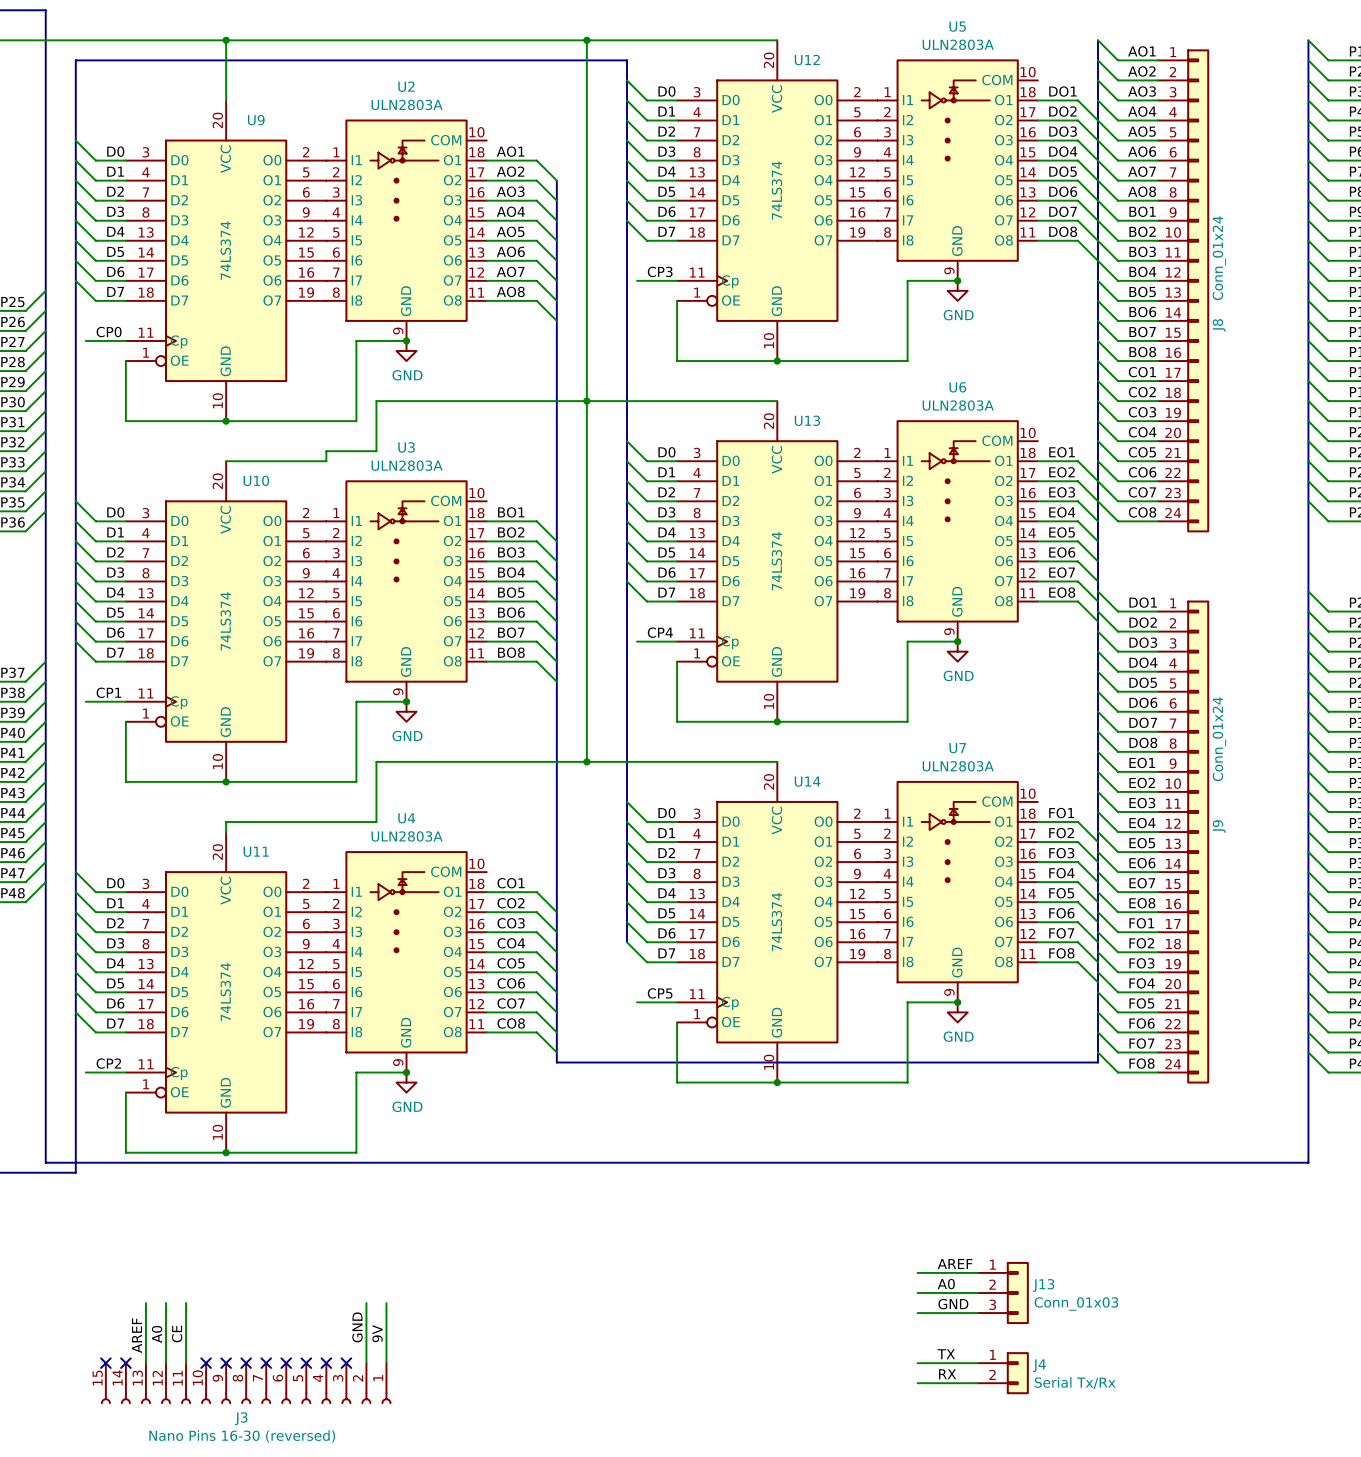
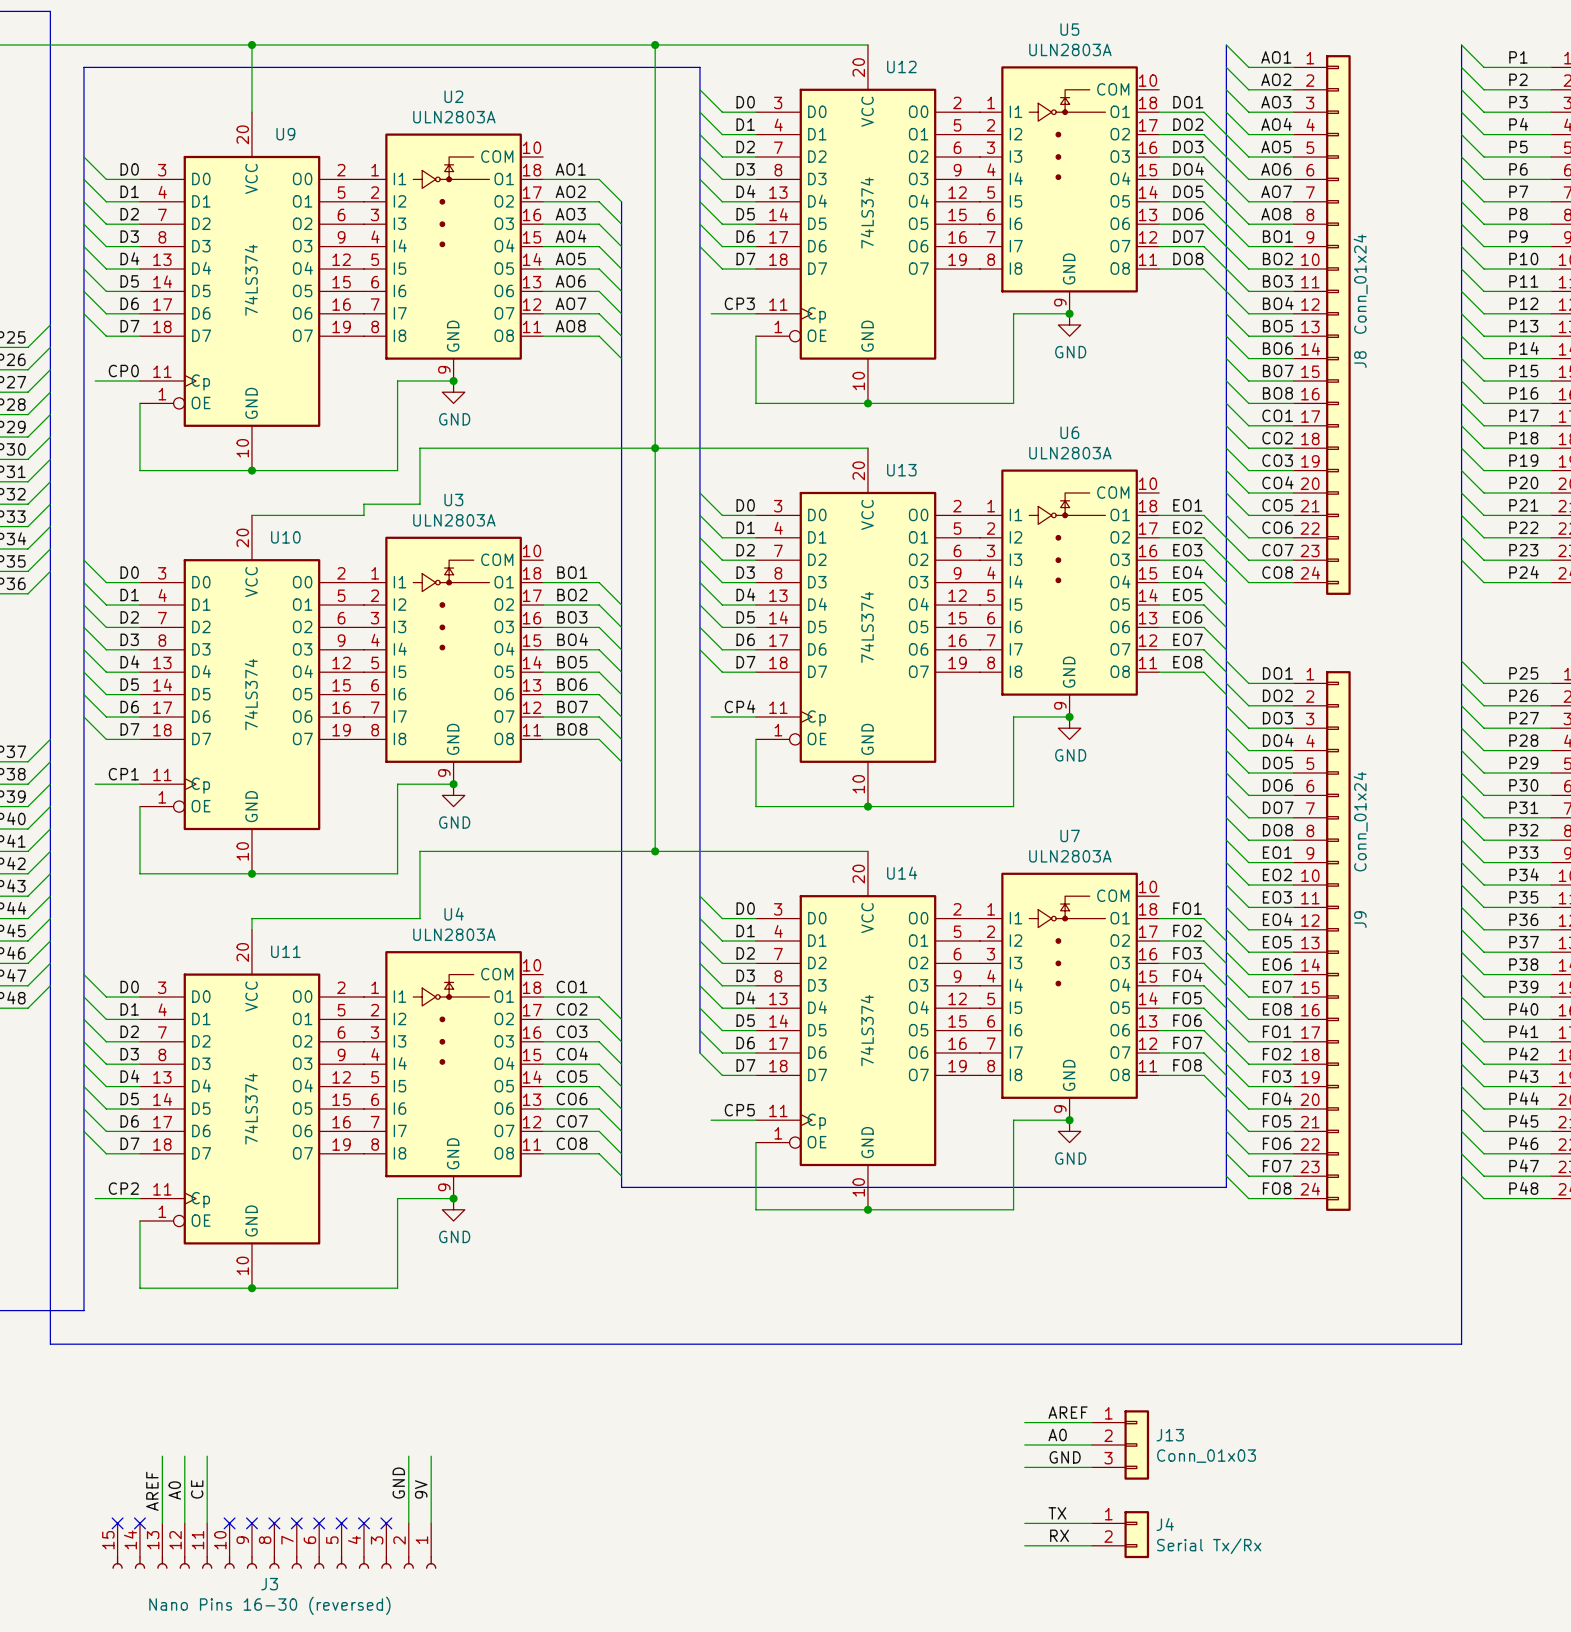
bus: (45, 1162) (1308, 1162) -> (50, 1299) (50, 1344) (1461, 1344) (1461, 1299)

